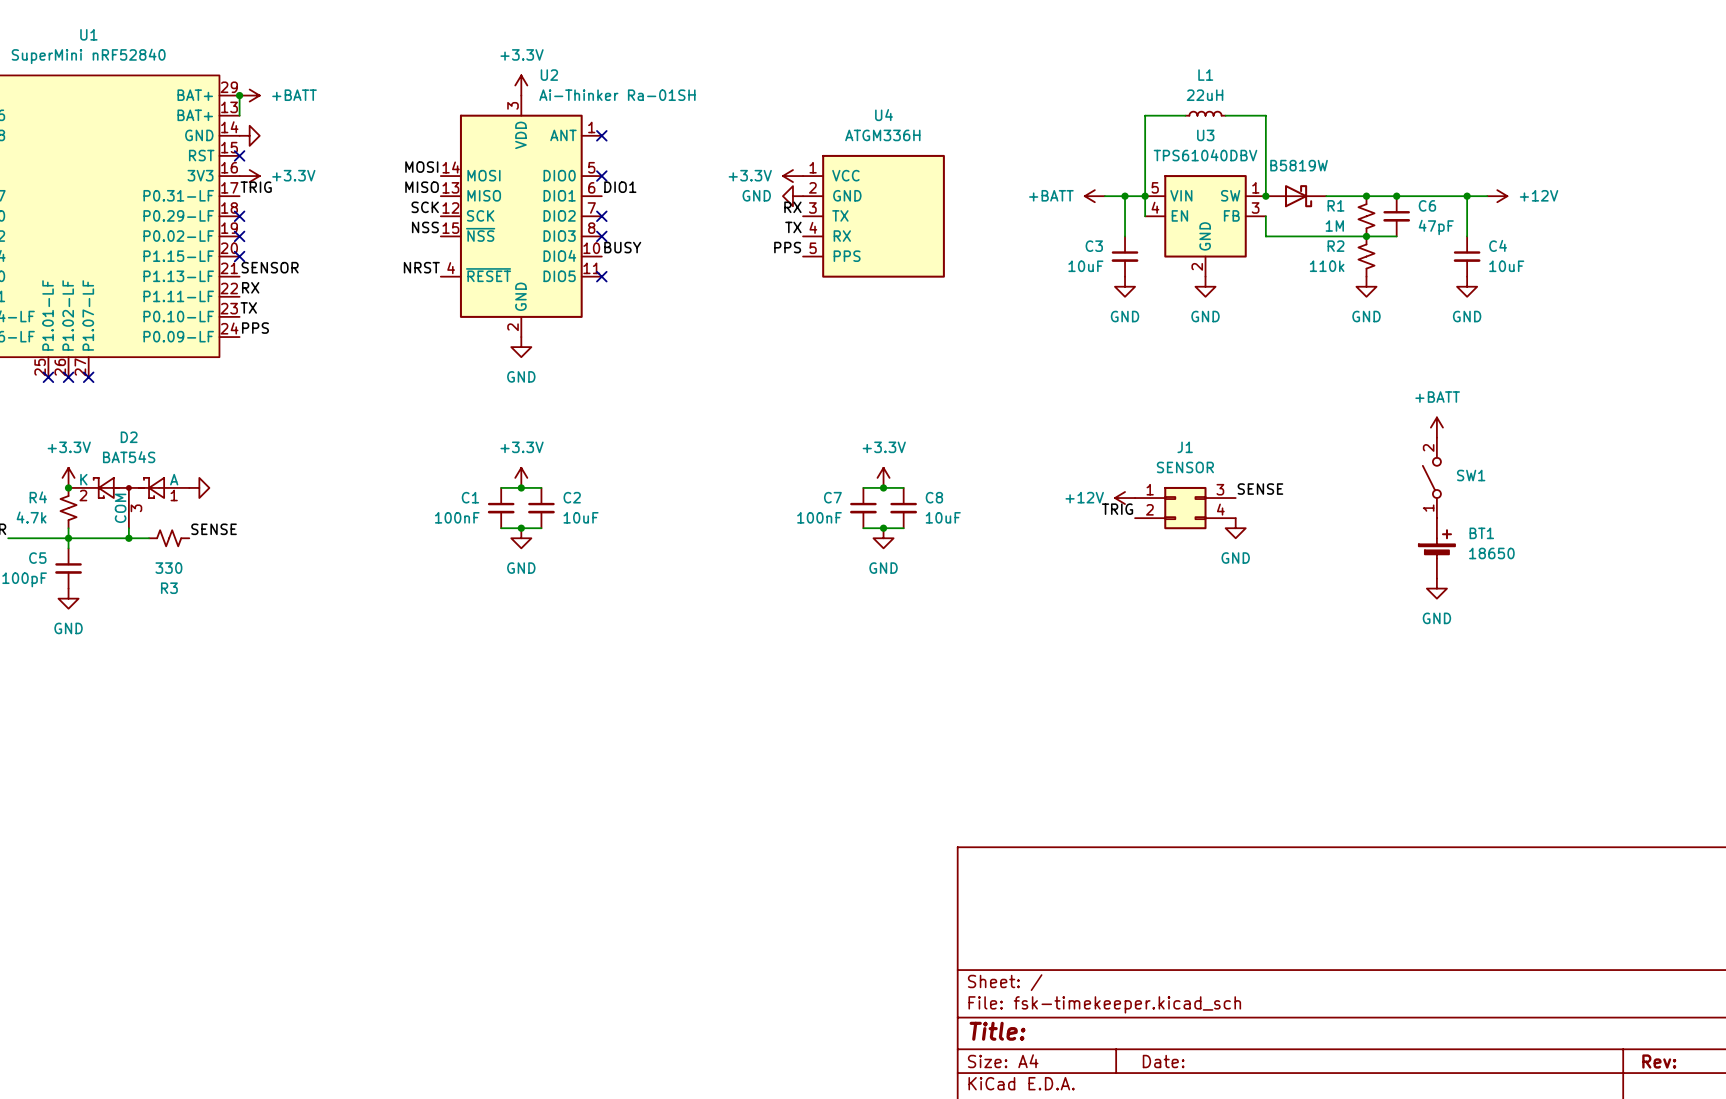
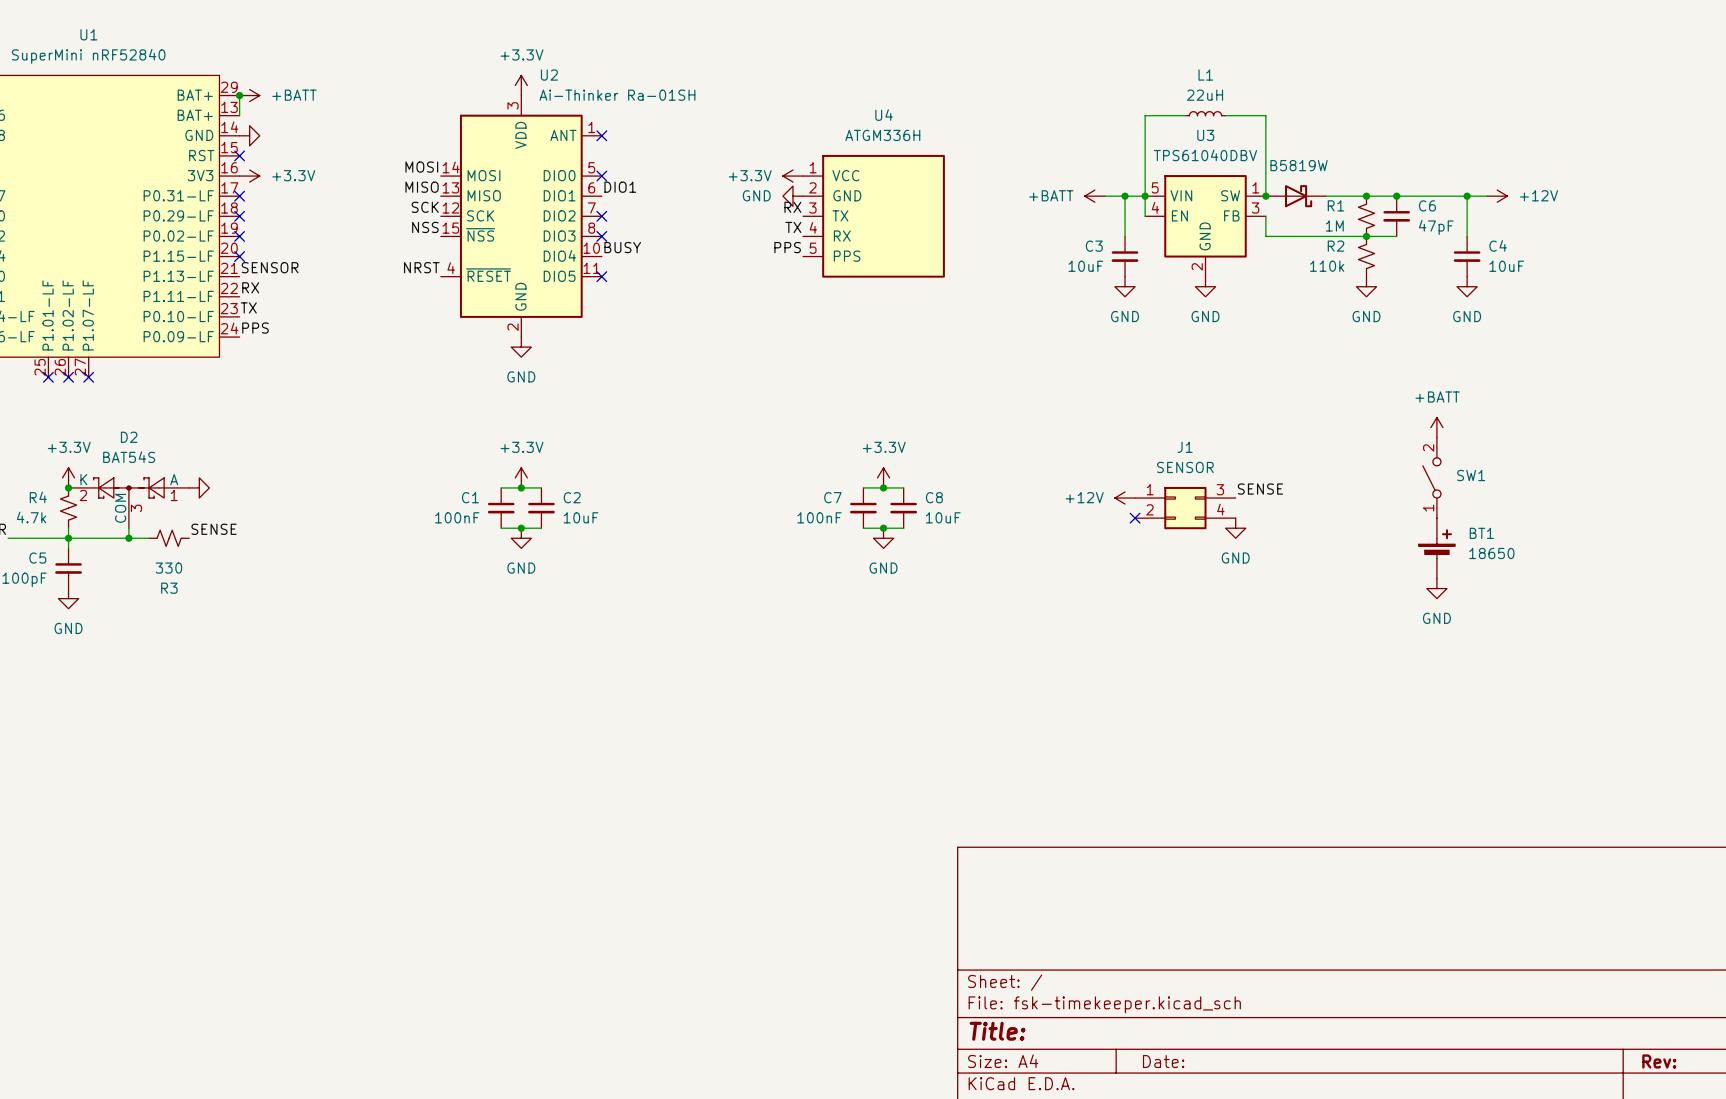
label: TRIG (256, 187) -> none
no-connect mark: none -> (239, 196)
label: TRIG (1117, 509) -> none
no-connect mark: none -> (1135, 518)

